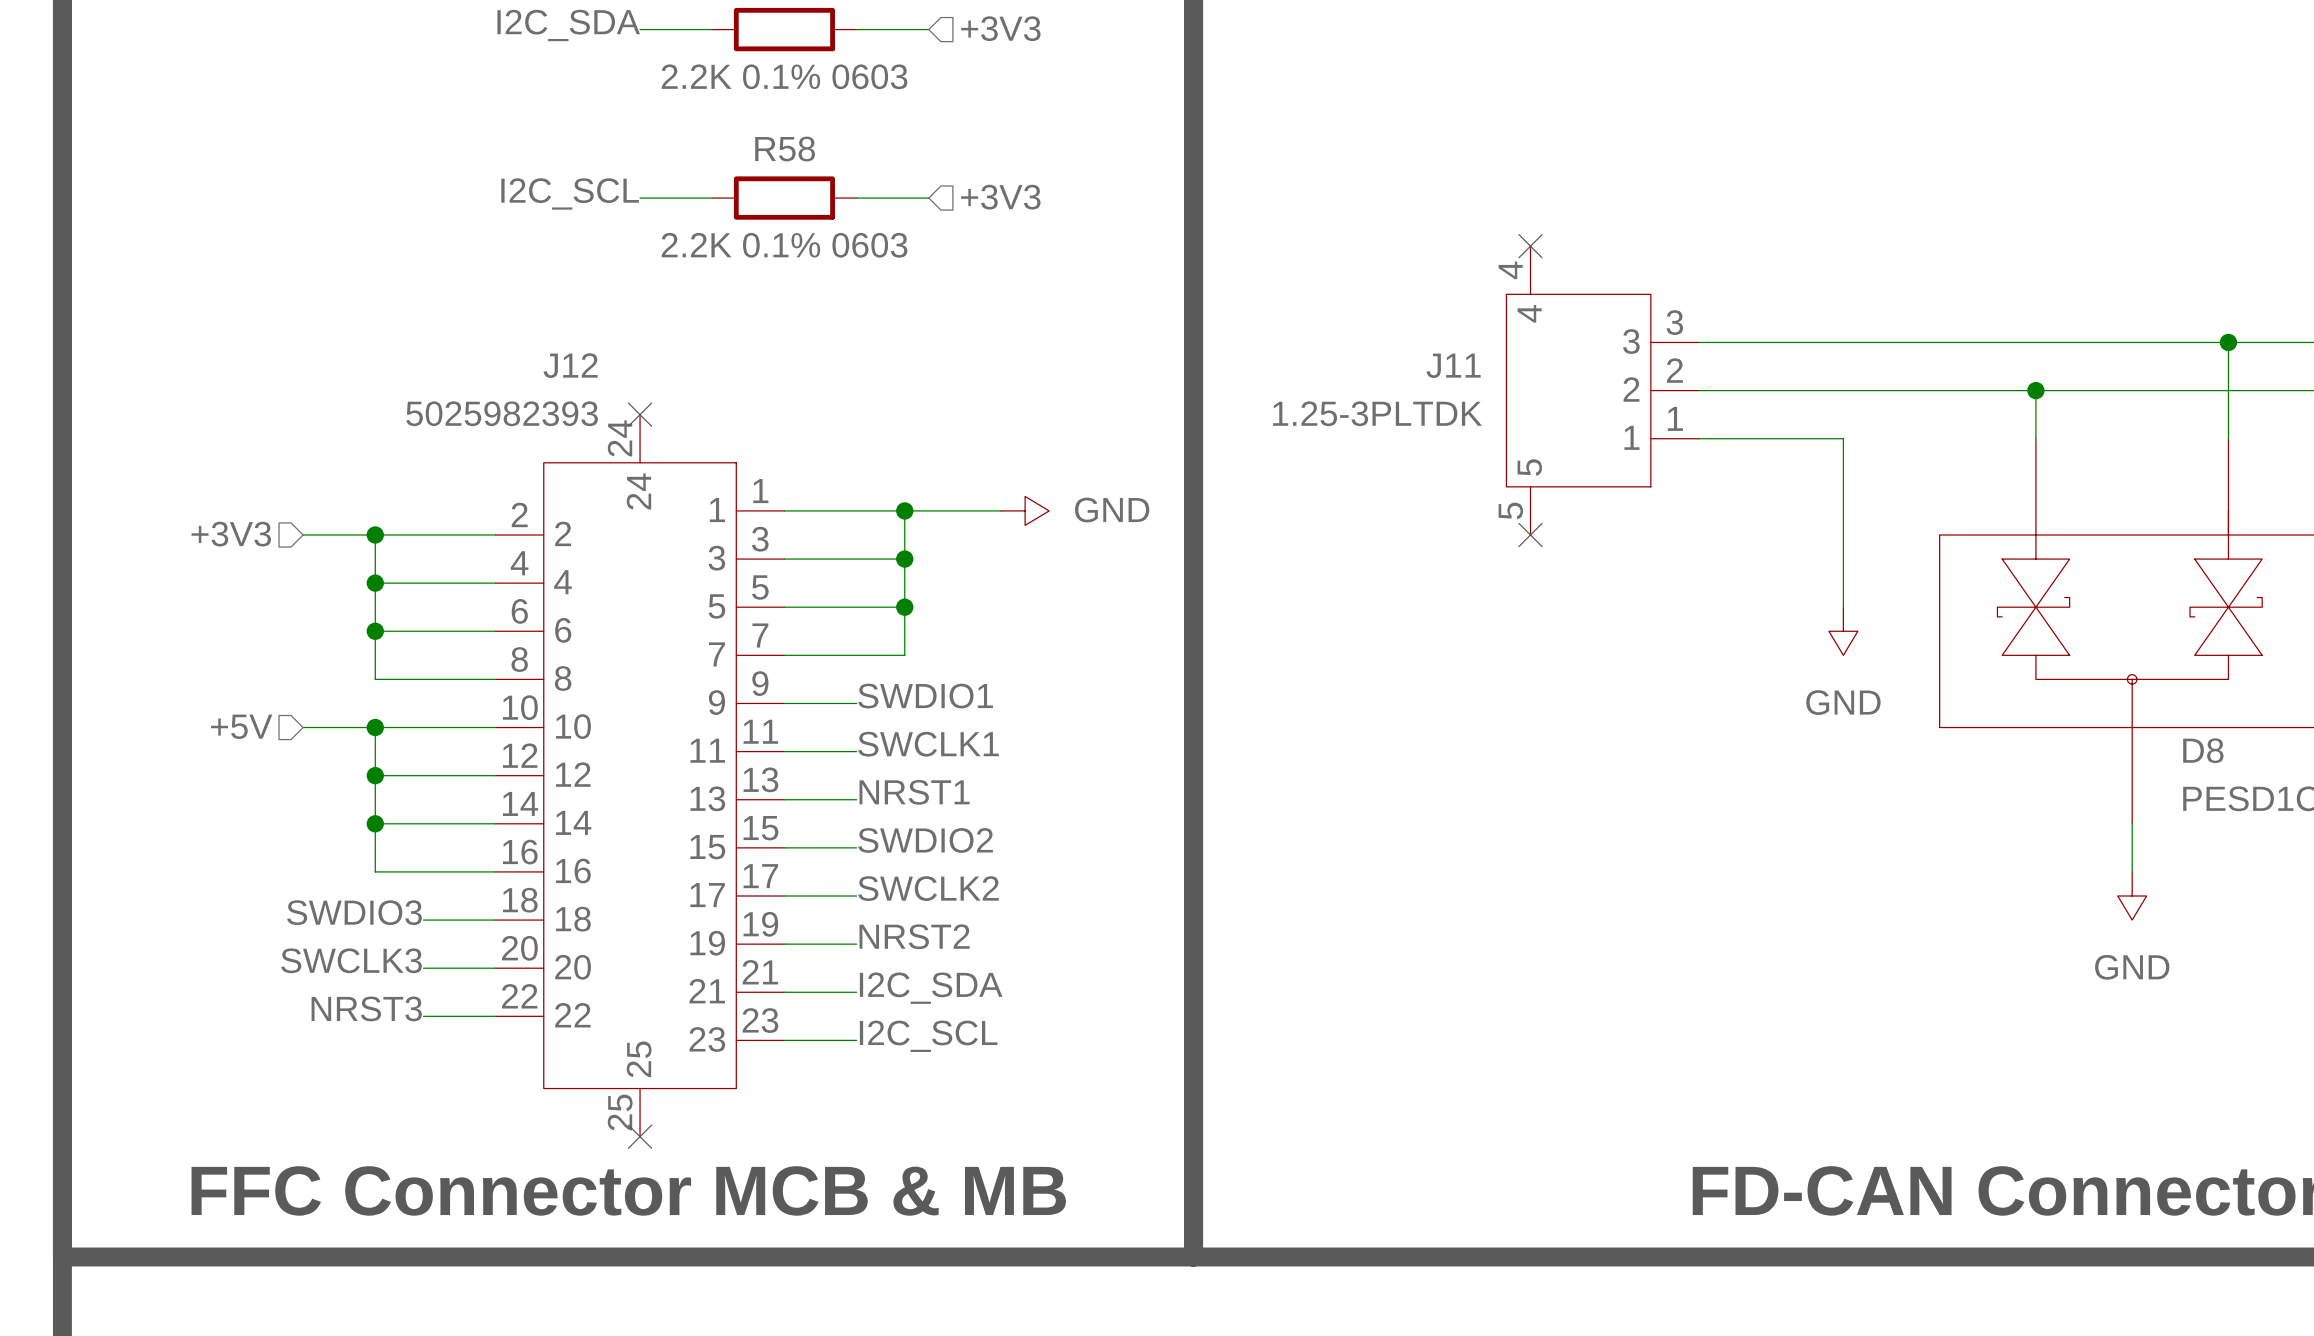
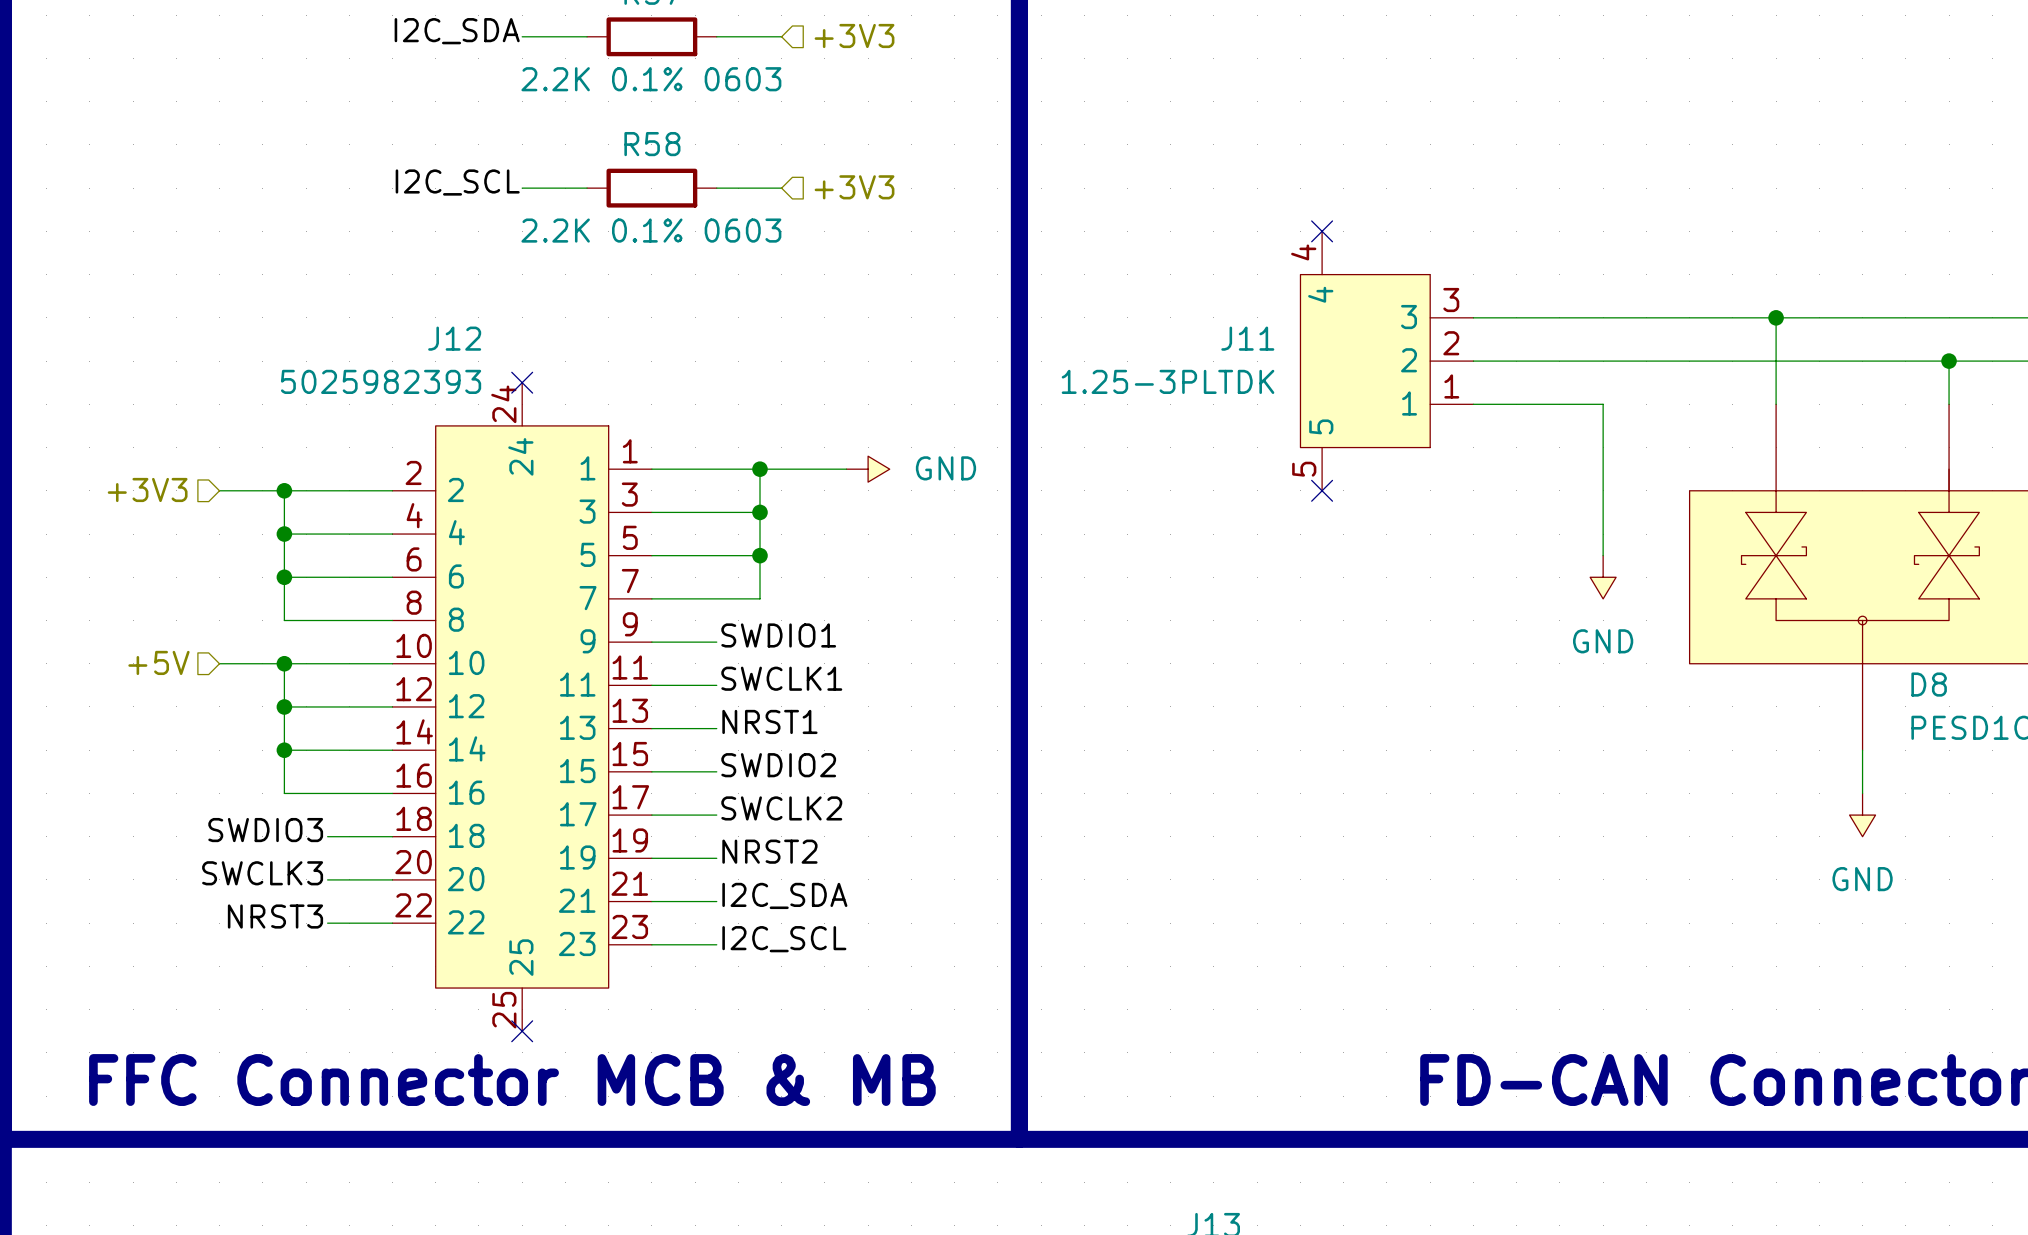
wire: (2228, 342) (2228, 390) -> (1776, 317) (1776, 361)
junction position: (2228, 342) -> (1949, 361)
junction position: (2035, 390) -> (1776, 317)

